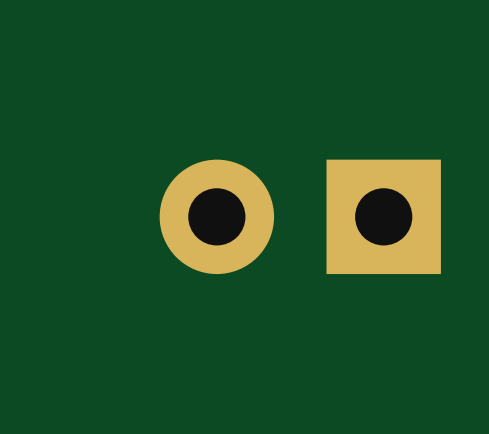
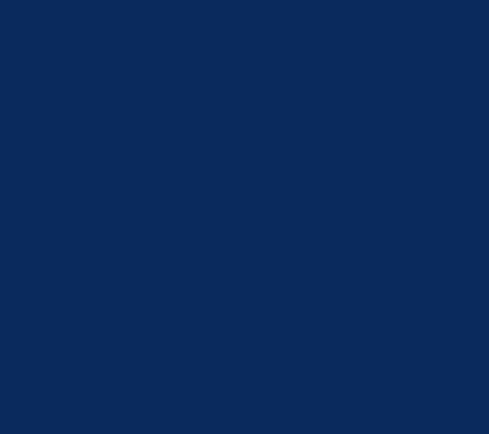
part: (300, 216) -> none

